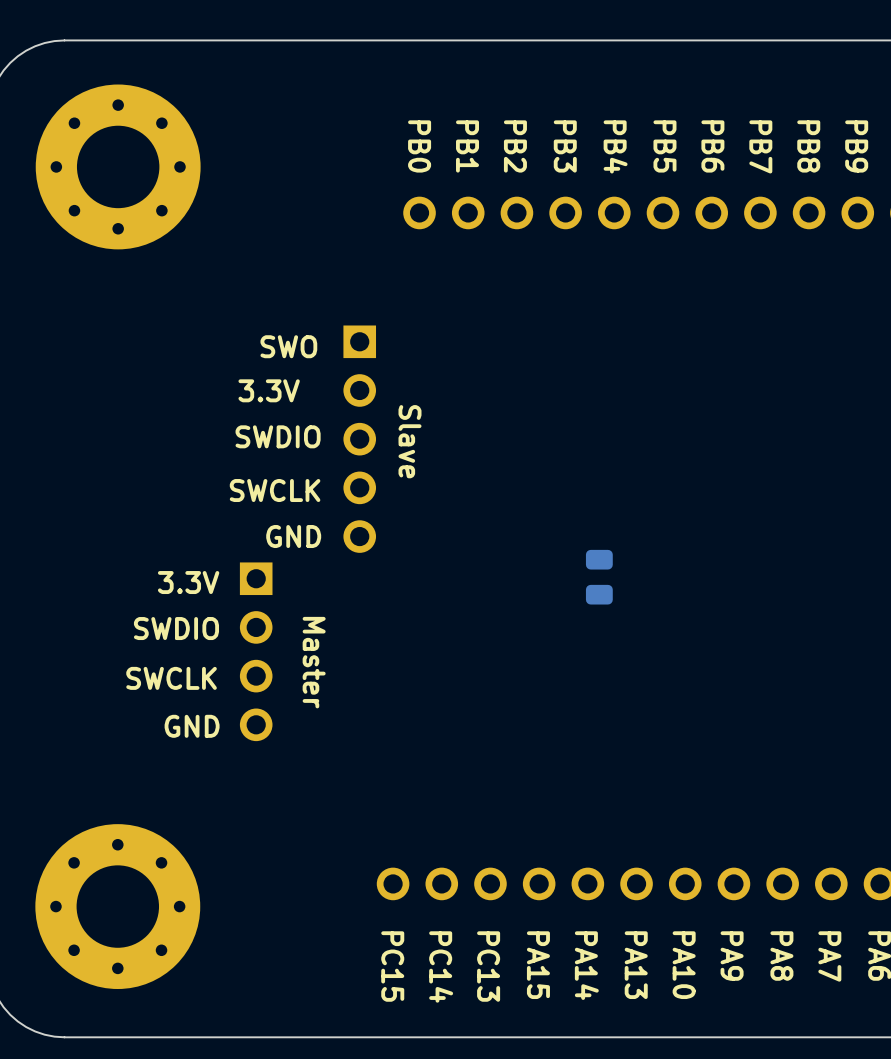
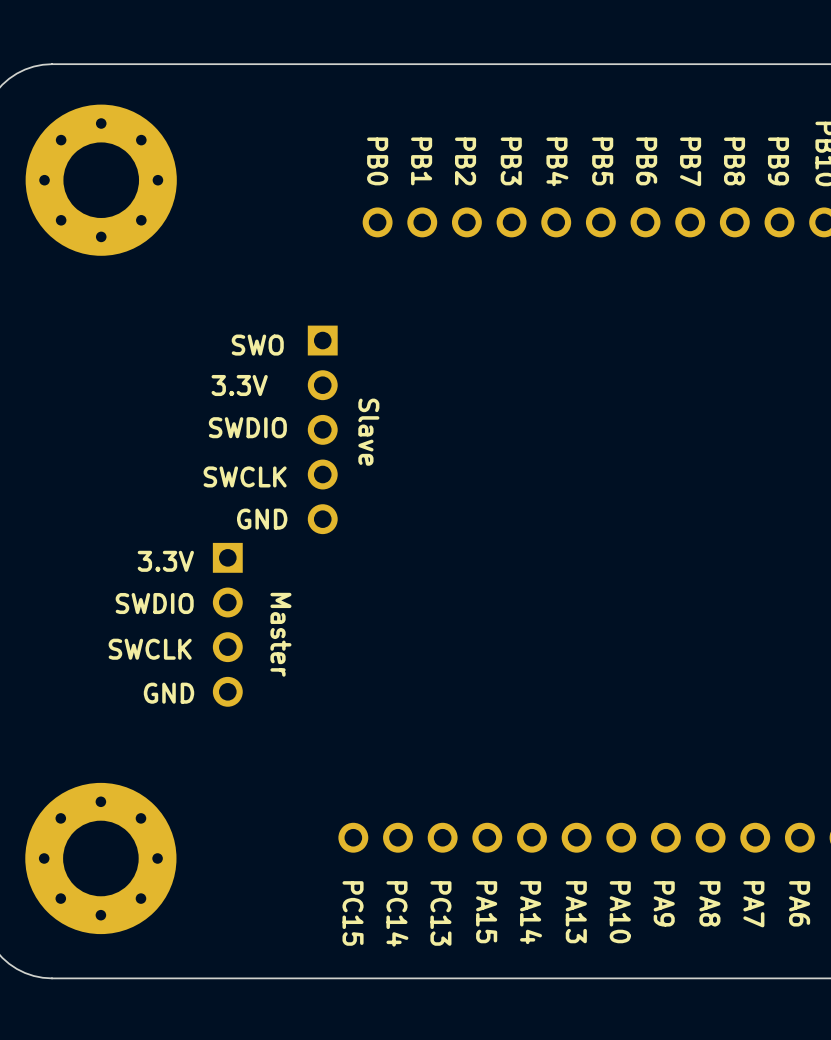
part: (599, 577) -> none

